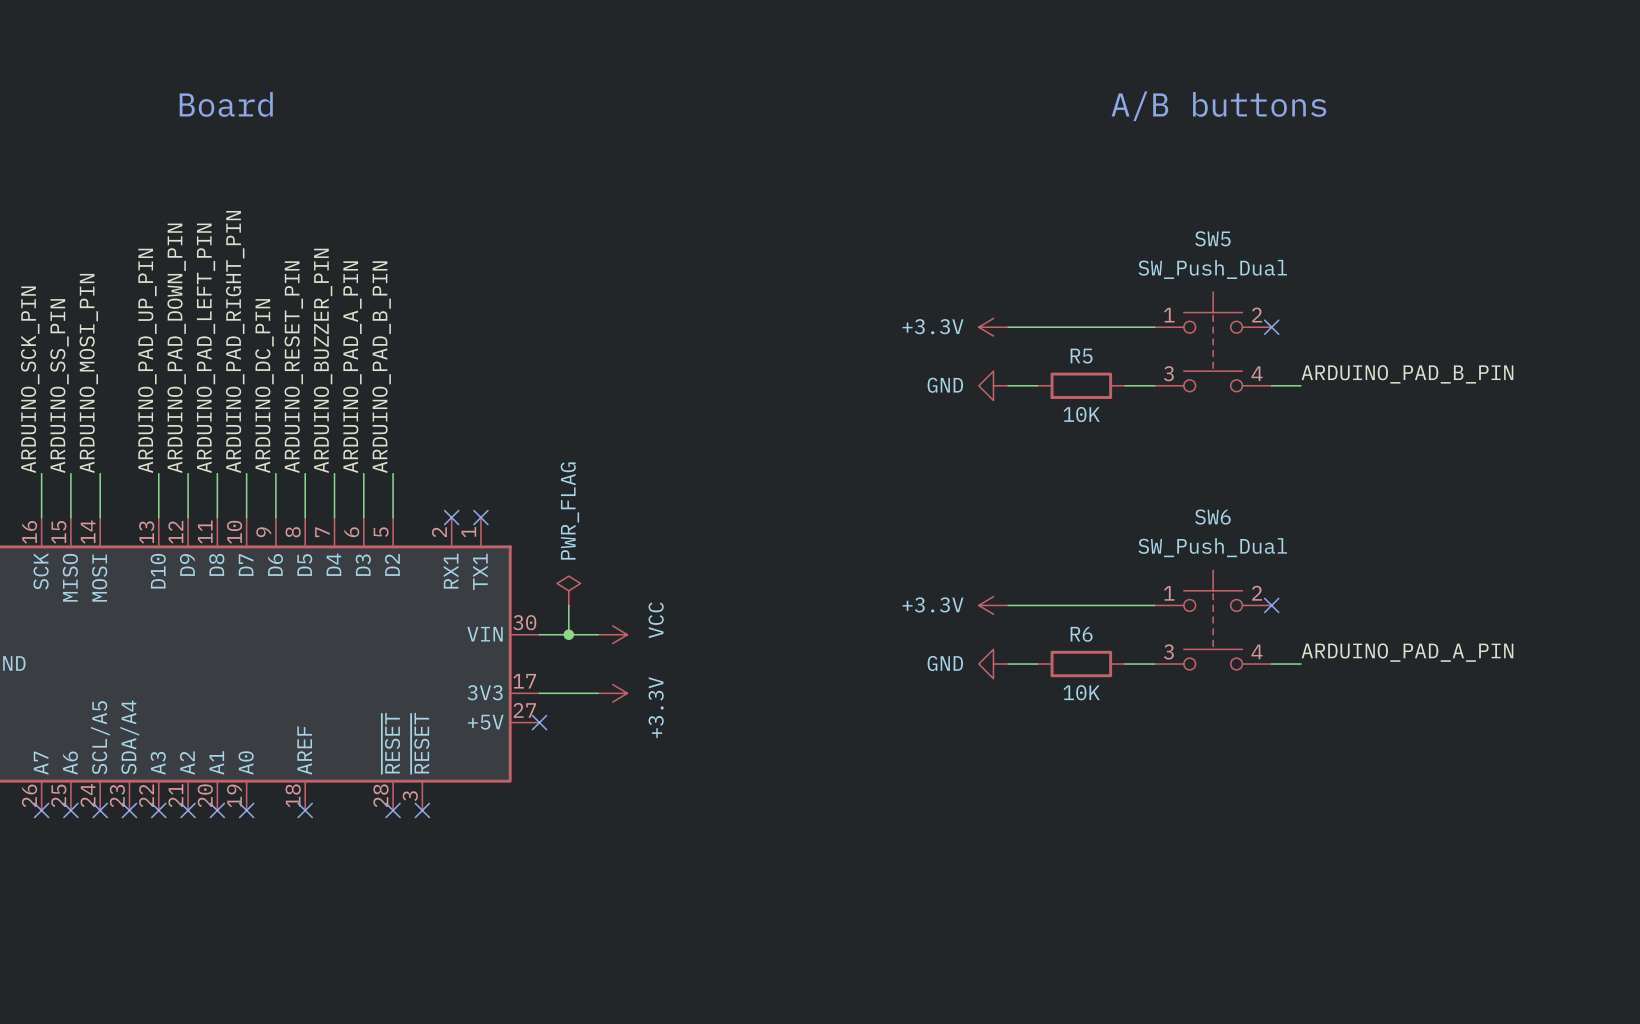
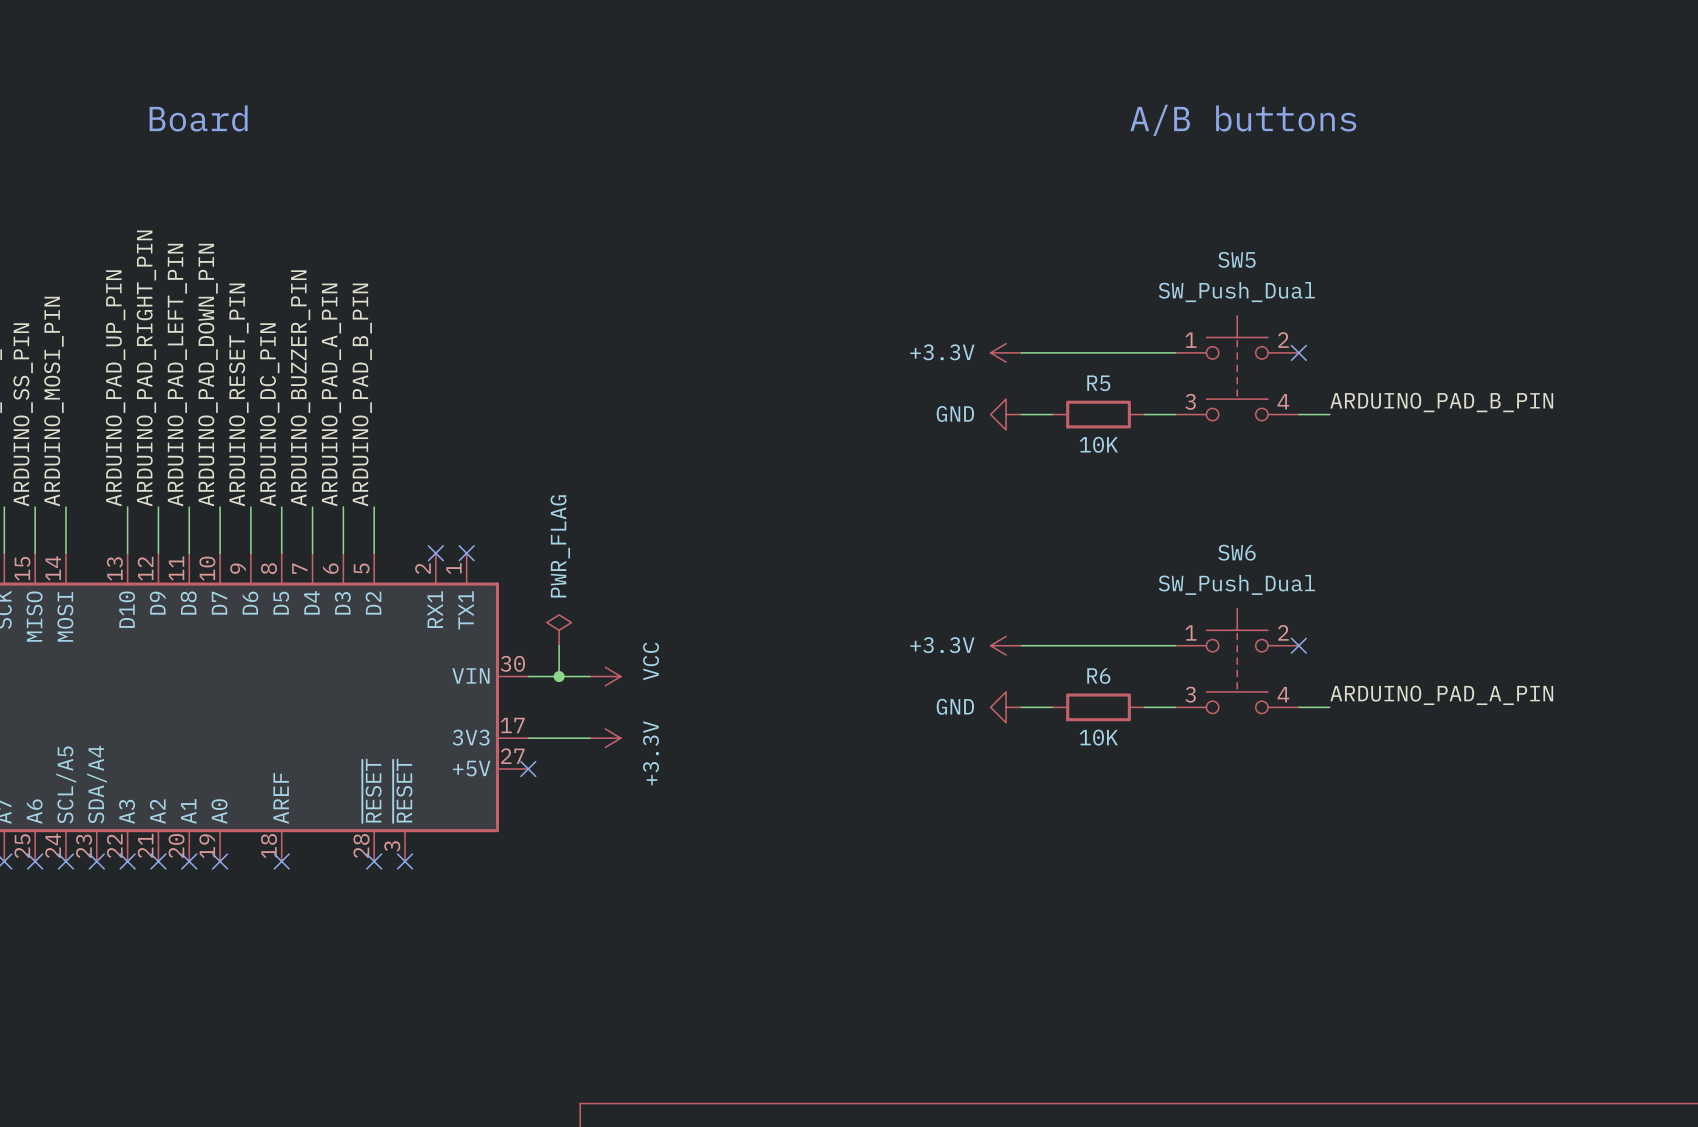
label: ARDUINO_PAD_RIGHT_PIN (235, 341) -> ARDUINO_PAD_DOWN_PIN (208, 375)
label: ARDUINO_PAD_DOWN_PIN (176, 348) -> ARDUINO_PAD_RIGHT_PIN (146, 368)
label: ARDUINO_RESET_PIN (293, 367) -> ARDUINO_DC_PIN (269, 414)
label: ARDUINO_DC_PIN (264, 386) -> ARDUINO_RESET_PIN (238, 394)

